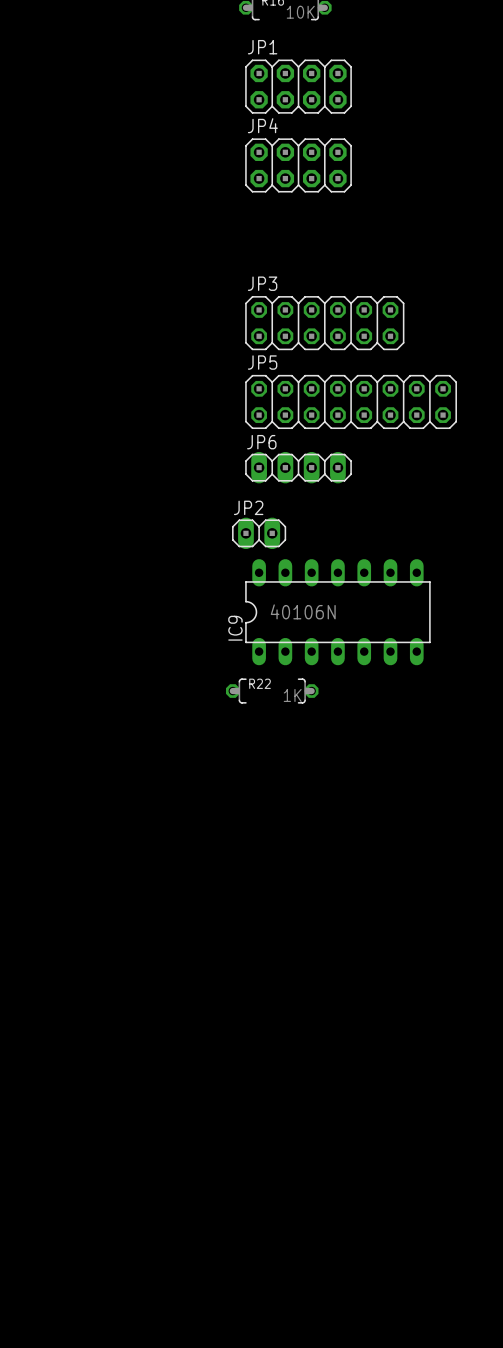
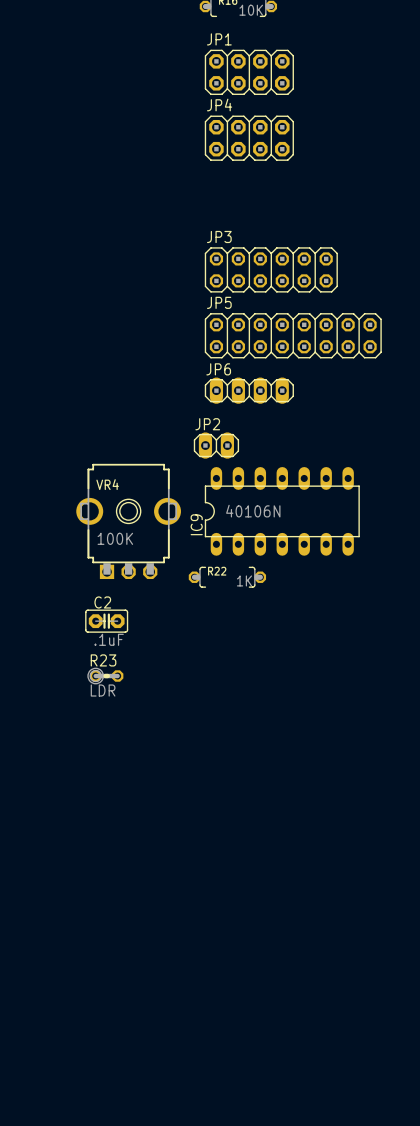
VR4: none -> 100K (128, 521)
C2: none -> .1uF (106, 621)
R23: none -> LDR (105, 676)

